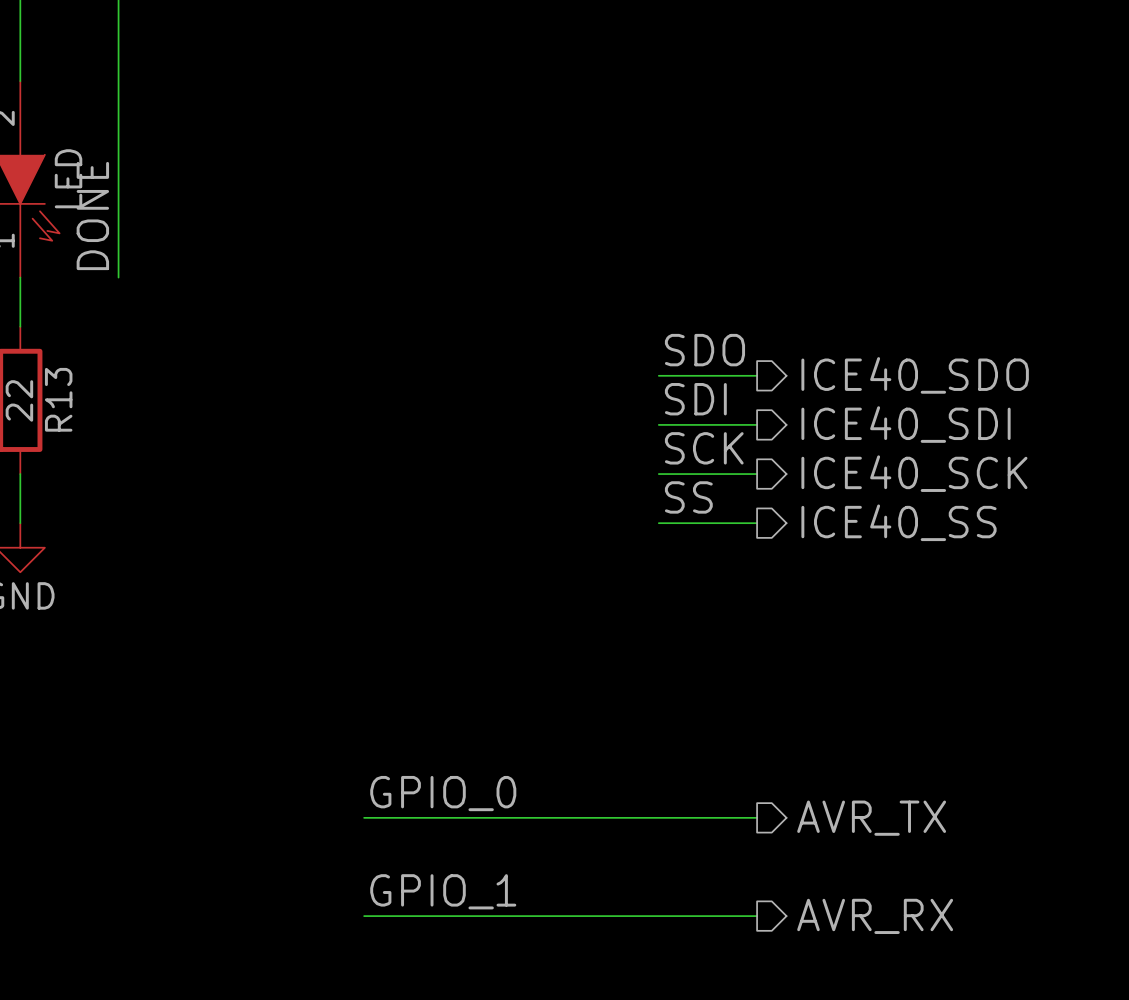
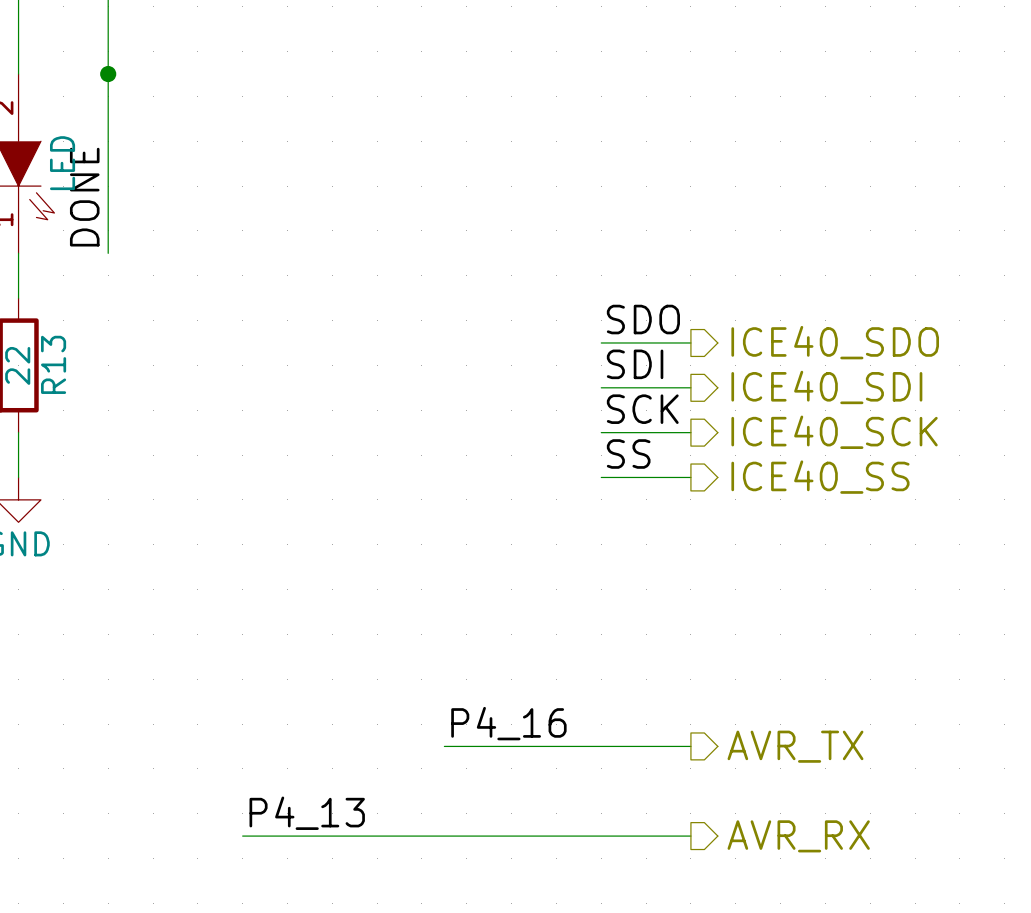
junction: none -> (108, 74)
label: none -> P4_16 (508, 723)
label: GPIO_0 (443, 793) -> none
wire: (364, 817) (486, 817) -> none
label: none -> P4_13 (307, 813)
label: GPIO_1 (443, 891) -> none
wire: none -> (242, 836) (332, 836)

